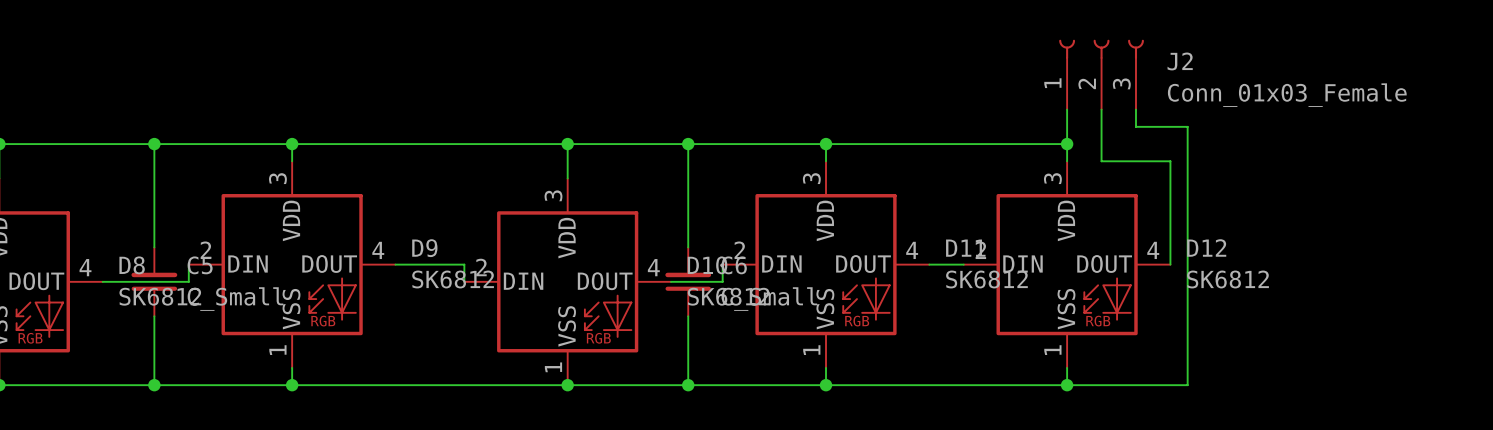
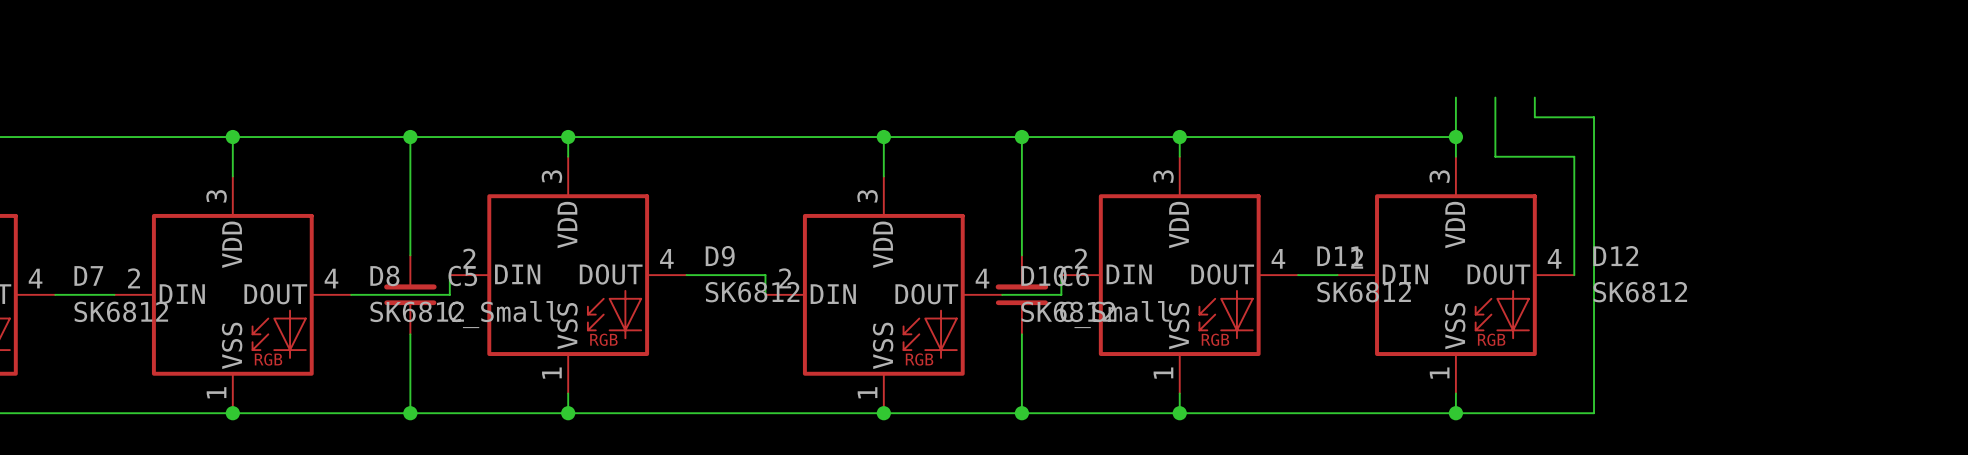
J2: Conn_01x03_Female (1101, 74) -> none

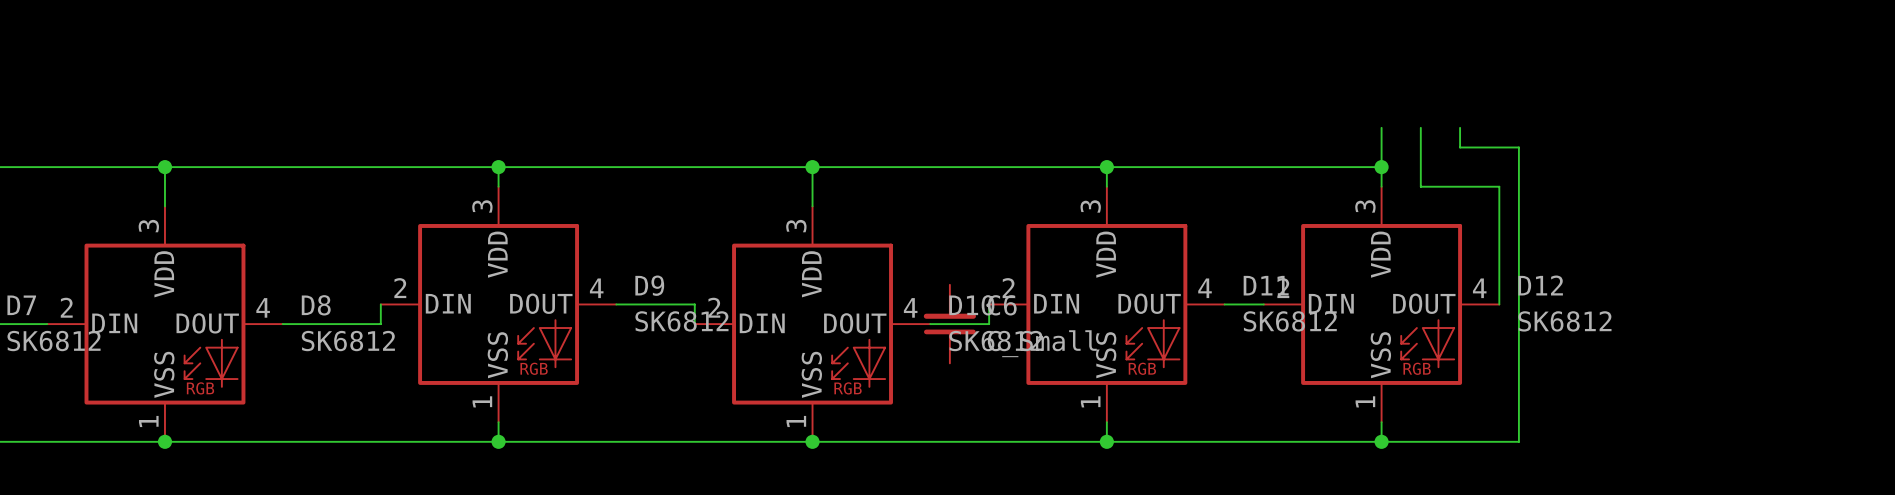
wire: (410, 137) (410, 255) -> none
junction: (410, 137) -> none
wire: (1021, 137) (1021, 255) -> none
junction: (1021, 137) -> none
C5: C_Small (410, 294) -> none
wire: (410, 334) (410, 413) -> none
wire: (1021, 334) (1021, 413) -> none
junction: (410, 413) -> none
junction: (1021, 413) -> none

